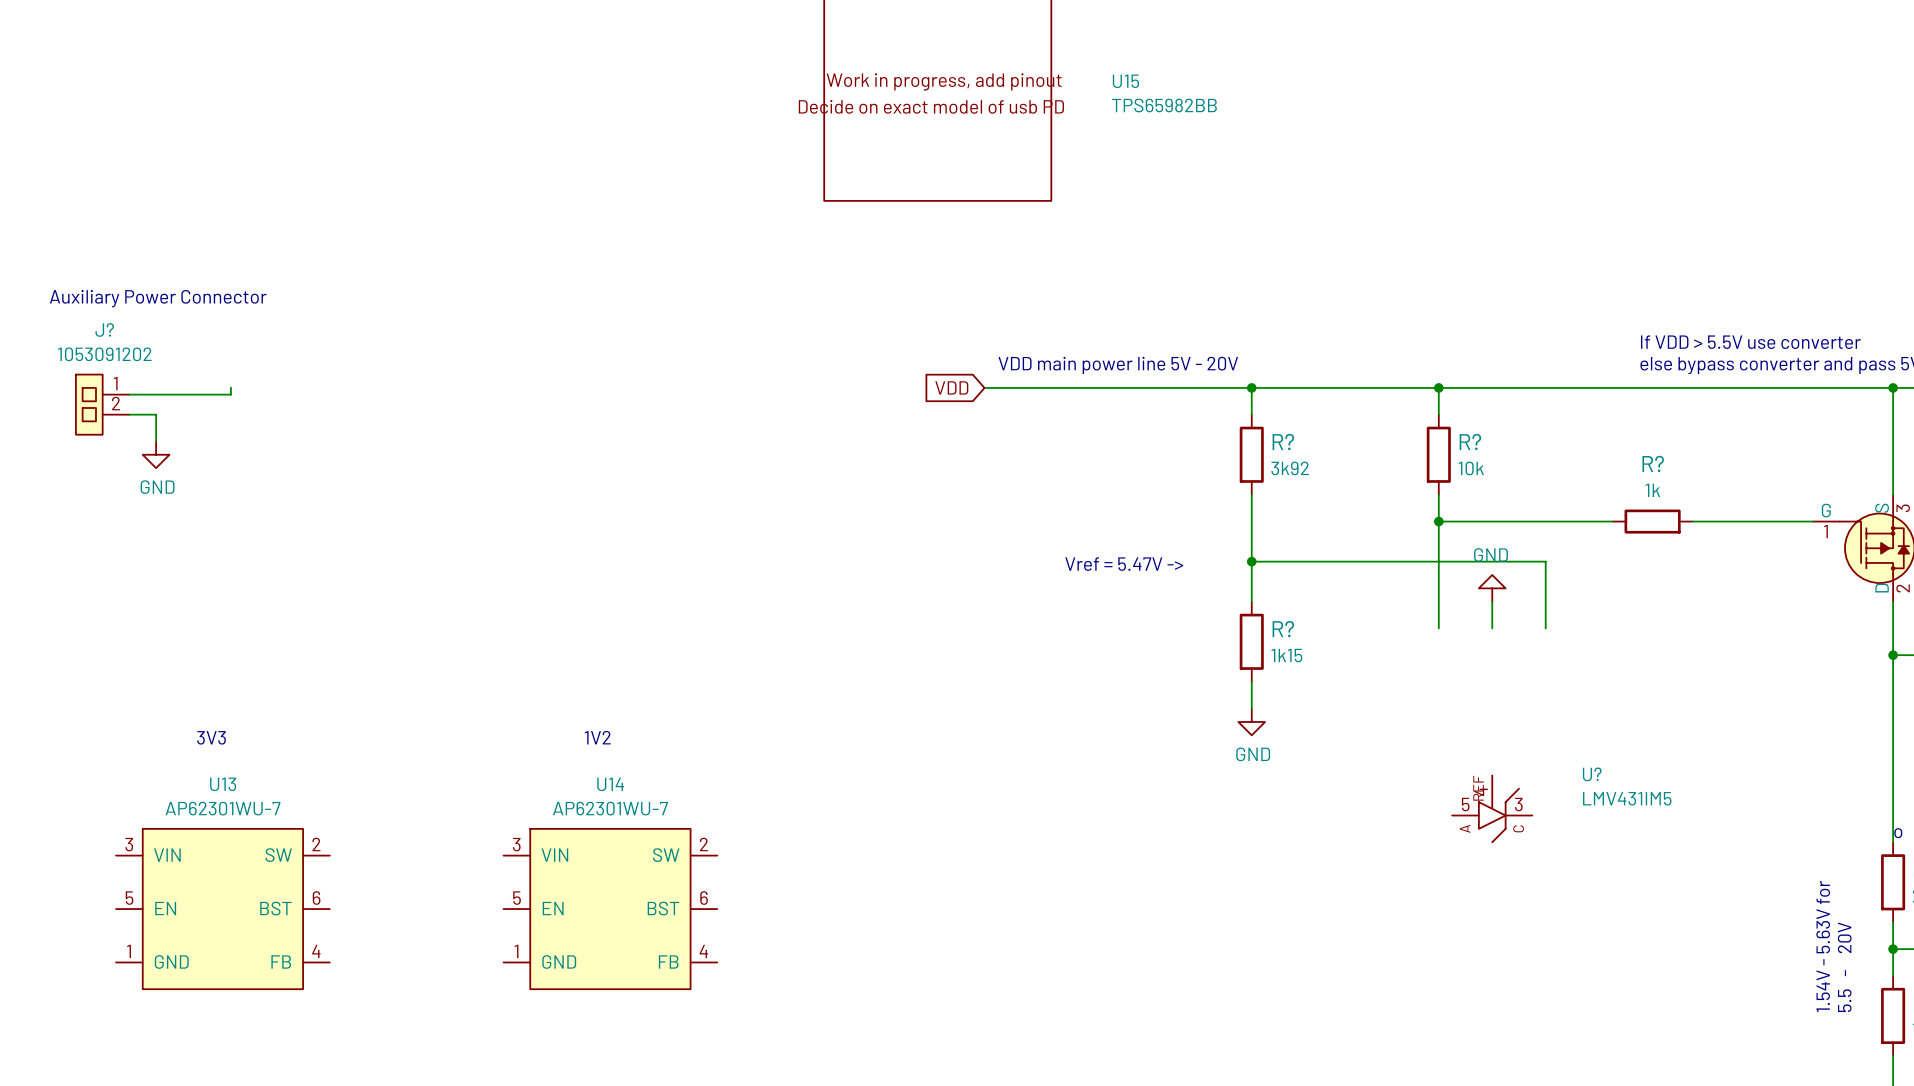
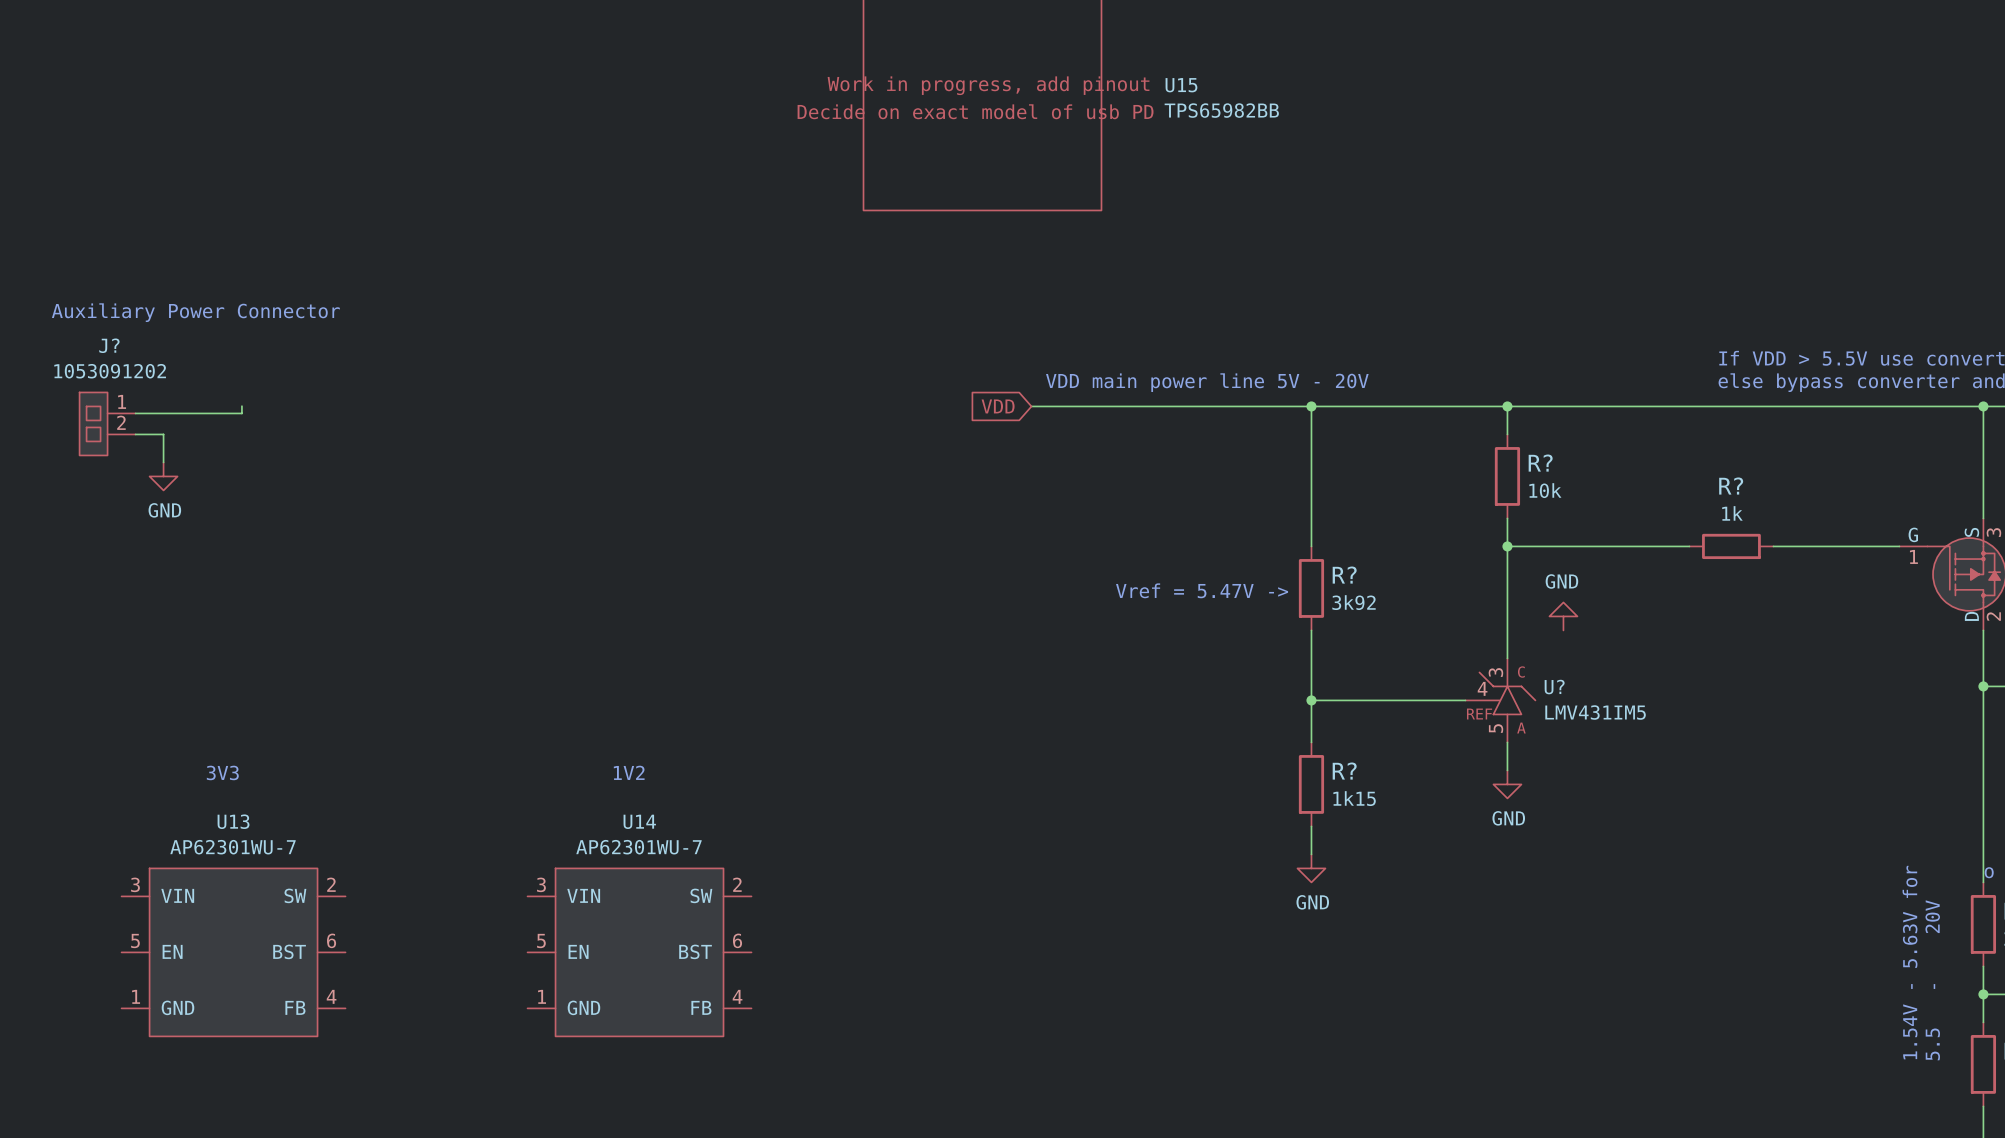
wire: none -> (1311, 434) (1311, 518)
R? position: (1251, 454) -> (1311, 588)
wire: (1251, 521) (1251, 601) -> (1311, 714) (1311, 630)
wire: (1251, 561) (1545, 561) (1545, 628) -> none
junction: (1251, 561) -> none
wire: (1492, 601) (1492, 628) -> (1507, 742) (1507, 770)
R? position: (1251, 641) -> (1311, 784)
wire: none -> (1311, 700) (1465, 700)
junction: none -> (1311, 700)
power symbol: GND (1251, 721) -> none
power symbol: none -> GND (1507, 784)
U? name position: U? (1592, 774) -> U? (1554, 687)
wire: none -> (1311, 826) (1311, 854)
U? value position: LMV431IM5 (1627, 798) -> LMV431IM5 (1595, 712)
U? position: (1492, 808) -> (1500, 700)
U? rotation: 0° (1498, 815) -> 90° counterclockwise (1507, 693)
power symbol: none -> GND (1311, 868)

